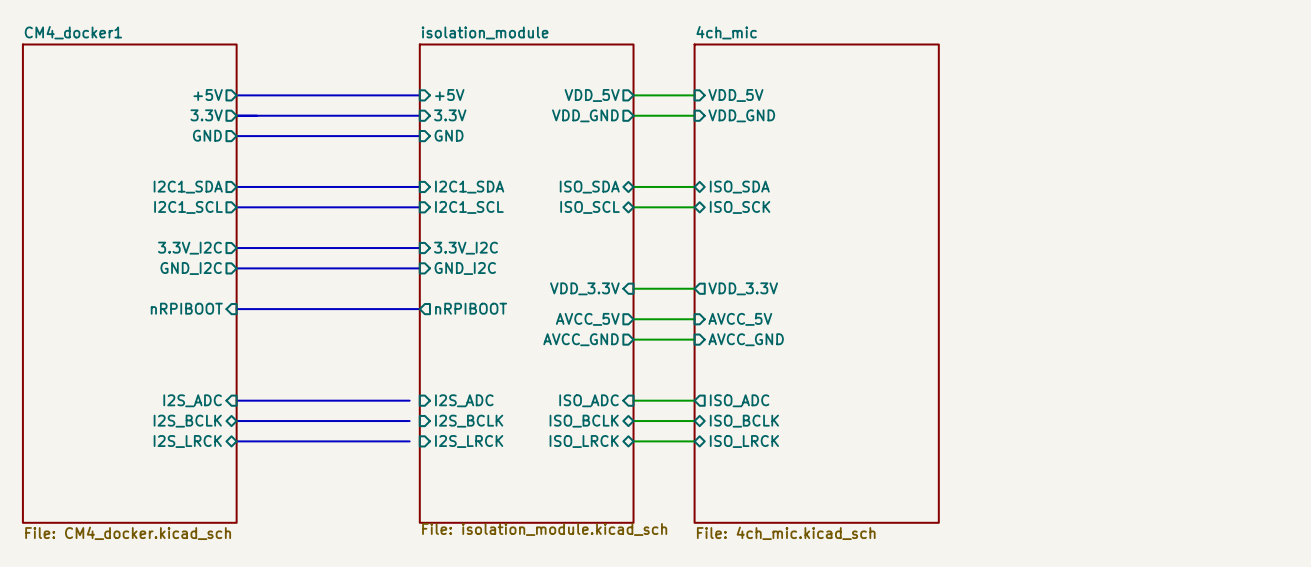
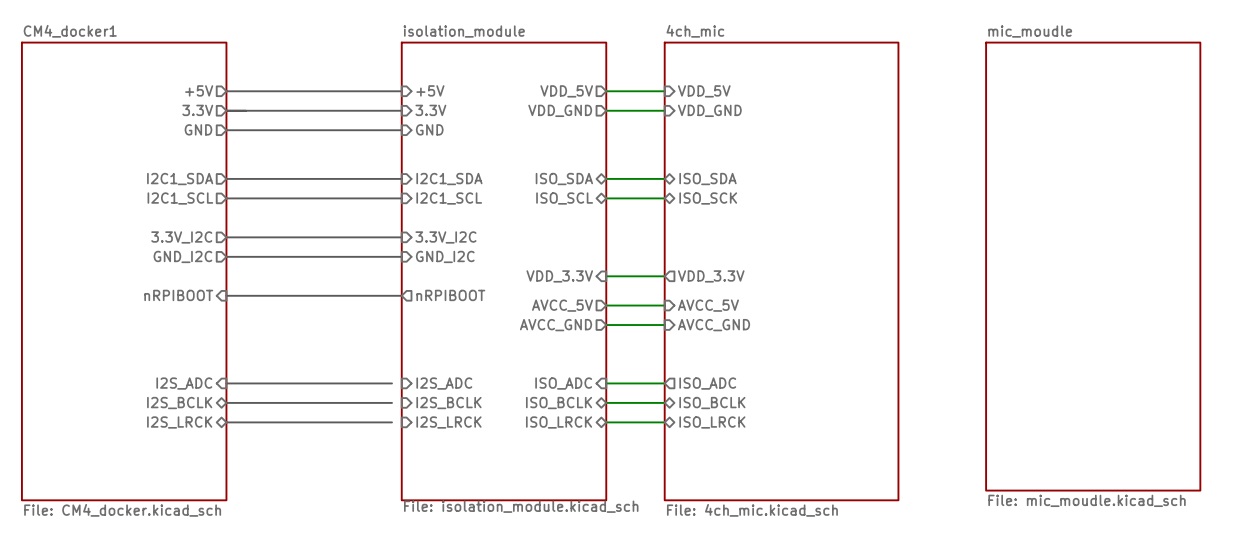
sheet mic_moudle: none -> File: mic_moudle.kicad_sch (1093, 266)

